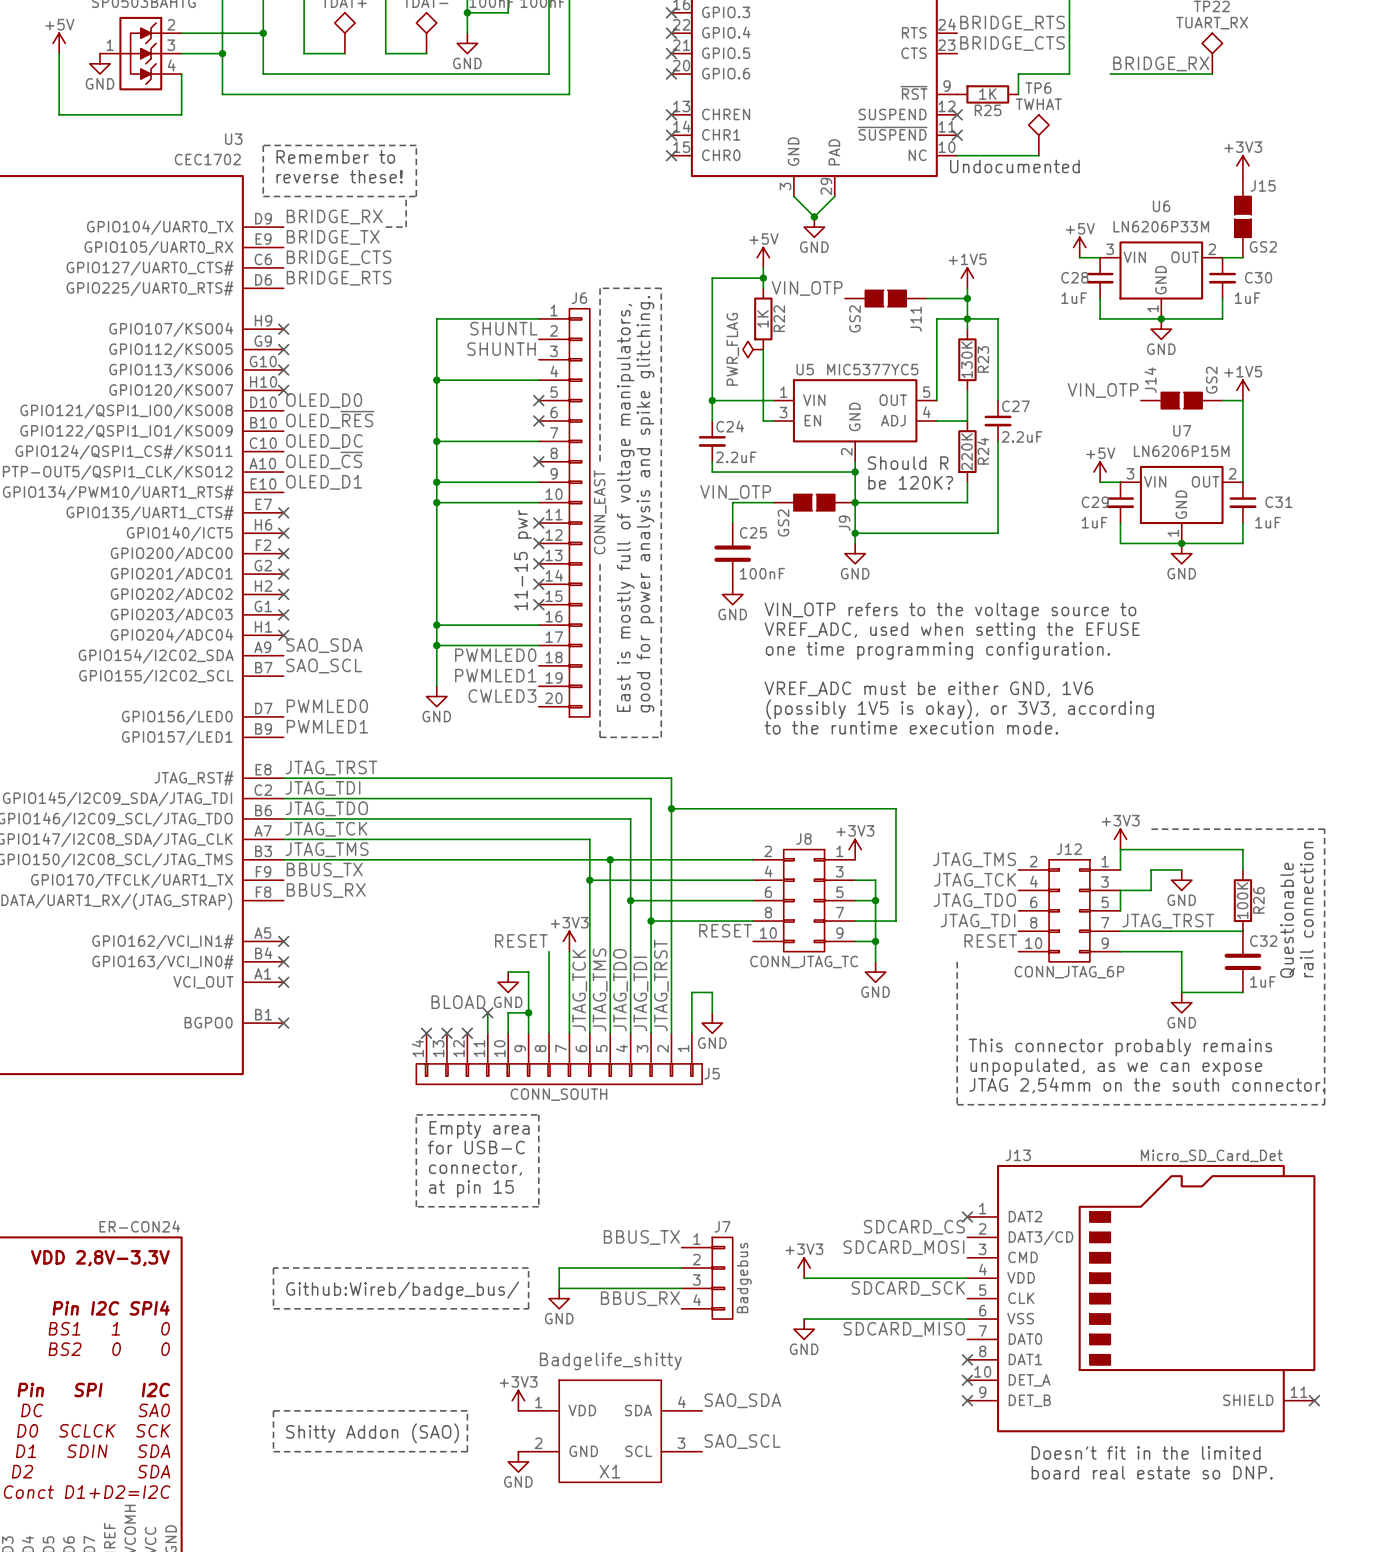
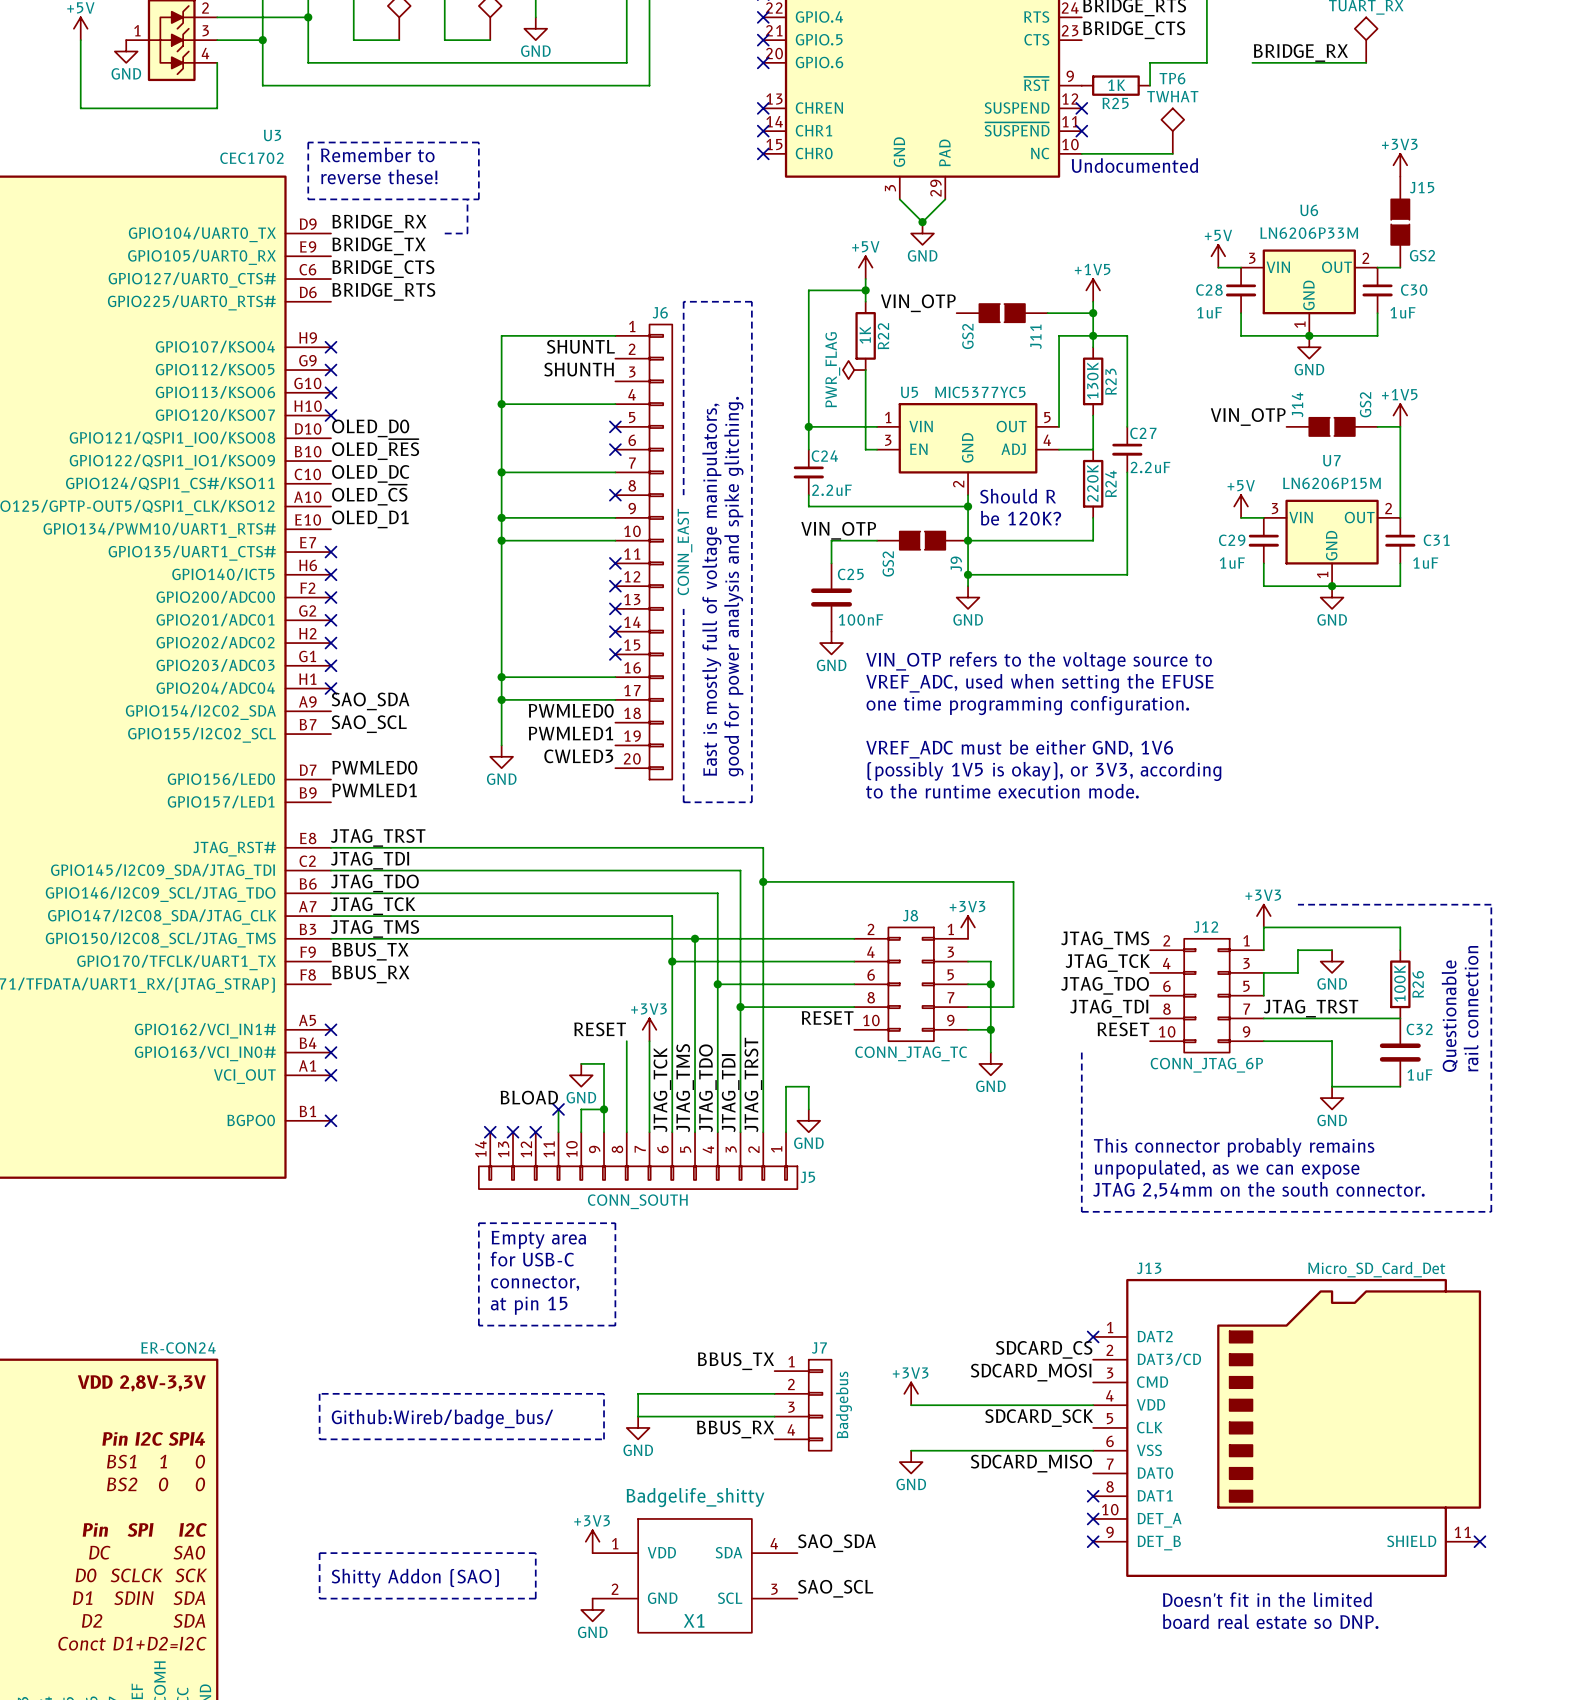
text: 11-15 pwr (523, 560) -> none

